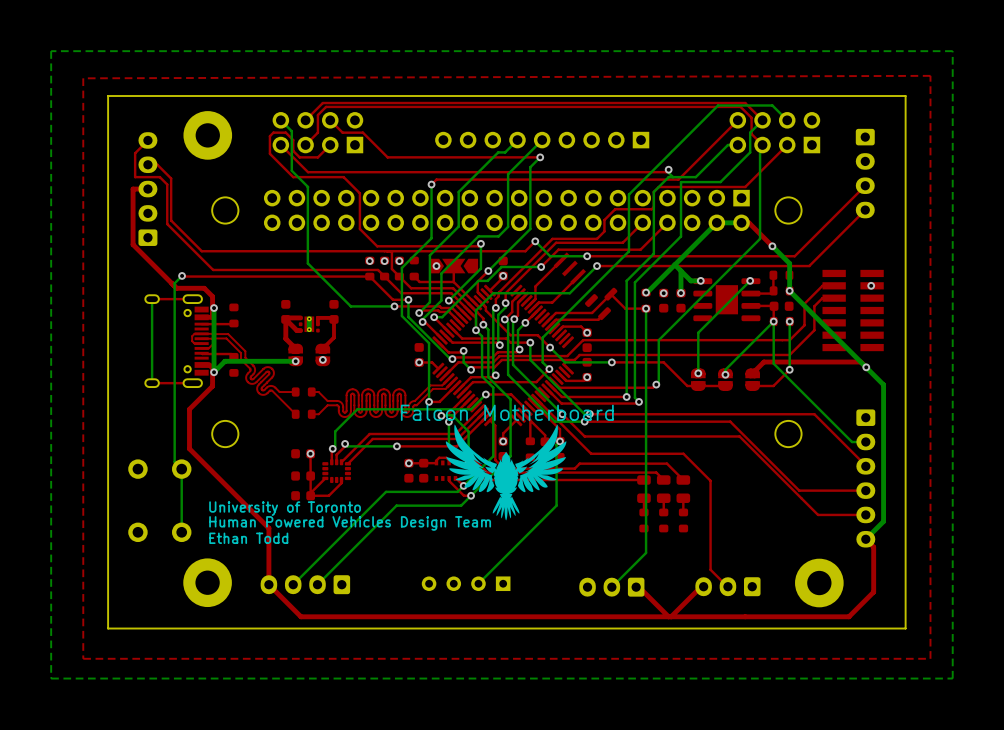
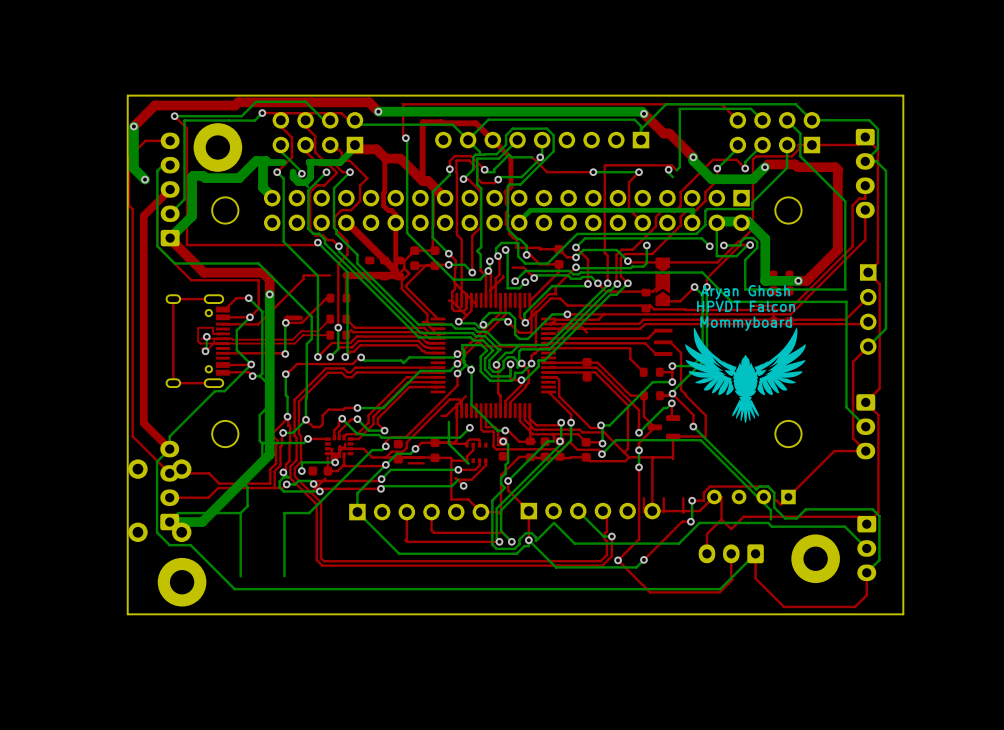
bottom zone outline: (952, 51) (51, 51) (51, 678) (952, 678) (952, 51) -> none
top zone outline: (930, 75) (83, 78) (83, 658) (930, 658) (930, 75) -> none
board edge: (905, 96) (108, 96) (108, 628) (905, 628) (905, 96) -> (903, 95) (903, 614) (127, 614) (127, 95) (903, 95)
top track: none -> (378, 111) (369, 102) (238, 102) (235, 105) (154, 105) (133, 126)
bottom track: none -> (378, 111) (641, 111) (643, 113)
via: none -> (378, 111)
top track: none -> (262, 113) (341, 113) (353, 124)
bottom track: none -> (262, 113) (254, 120) (229, 120)
via: none -> (262, 113)
top track: none -> (643, 113) (663, 133) (669, 133) (693, 157)
via: none -> (643, 113)
top track: none -> (174, 116) (187, 128) (187, 245) (315, 245) (317, 242)
bottom track: none -> (174, 116) (241, 116) (256, 101) (305, 101) (328, 124)
via: none -> (174, 116)
bottom track: none -> (184, 120) (184, 199) (170, 213)
bottom track: none -> (229, 120) (184, 120)
bottom track: (280, 120) (291, 131) (291, 170) -> none
top track: (330, 120) (342, 132) (362, 132) (387, 157) (540, 157) -> none
top track: (737, 120) (678, 179) (436, 179) (431, 184) -> (737, 120) (721, 104) (403, 104) (403, 135) (405, 138)
top track: (762, 120) (745, 103) (322, 103) (305, 120) -> none
bottom track: (762, 120) (750, 132) (750, 152) (720, 182) (681, 182) (681, 236) (634, 282) (634, 397) (639, 401) -> (762, 120) (750, 108) (679, 108) (679, 167) (676, 170)
bottom track: (787, 120) (772, 105) (718, 105) (628, 194) (628, 251) (542, 337) (542, 362) (549, 369) -> (787, 120) (800, 133) (800, 156) (845, 201) (845, 289) (745, 289) (745, 259) (757, 247) (757, 242) (753, 238) (744, 238) (740, 242) (740, 245) (723, 245)
top track: none -> (279, 124) (291, 137) (291, 157) (277, 172)
bottom track: none -> (353, 124) (452, 124) (479, 151) (479, 154)
bottom track: none -> (133, 126) (133, 168) (145, 179)
via: none -> (133, 126)
bottom track: none -> (641, 129) (666, 104) (795, 104) (811, 120) (869, 120) (877, 128) (877, 148) (865, 161) (876, 161) (886, 170) (886, 328) (868, 346)
part position: (207, 135) -> (217, 147)
bottom track: none -> (405, 138) (407, 233) (453, 279) (480, 279) (489, 269) (489, 261)
via: none -> (405, 138)
top track: (147, 140) (135, 153) (135, 177) (159, 177) (167, 184) (167, 224) (213, 269) (378, 269) (401, 293) (451, 293) (476, 317) (476, 330) -> none
top track: none -> (170, 140) (145, 140) (128, 157) (128, 205) (132, 209) (132, 436) (169, 473) (209, 473) (219, 483) (270, 483) (270, 469) (276, 463) (277, 443) (271, 434) (287, 416) (288, 425) (290, 425) (289, 461) (283, 472)
bottom track: (542, 140) (508, 174) (508, 226) (498, 236) (478, 236) (441, 273) (441, 300) (422, 319) (422, 322) -> (542, 140) (542, 156) (521, 177) (500, 177) (498, 179)
bottom track: none -> (641, 140) (641, 126) (634, 119) (488, 119) (468, 140)
bottom track: none -> (787, 144) (787, 167) (752, 202) (752, 209) (707, 209) (705, 210) (705, 225) (696, 233) (577, 233) (547, 263) (525, 263) (518, 256) (518, 242) (501, 242) (496, 248) (498, 256)
top track: (280, 145) (308, 172) (342, 172) -> (303, 124) (315, 136) (315, 152) (323, 160) (331, 160) (342, 172)
top track: (330, 145) (317, 157) (299, 157) (293, 150) (293, 140) (285, 132) (273, 132) (269, 136) (269, 153) (293, 177) (343, 177) (359, 193) (359, 229) (377, 246) (478, 246) (480, 243) -> none
bottom track: (737, 145) (727, 145) (695, 177) (668, 177) (653, 191) (653, 253) (626, 280) (626, 396) -> (737, 144) (737, 148) (717, 168)
top track: (762, 145) (751, 134) (751, 117) (740, 106) (326, 106) (317, 115) (317, 132) (305, 145) -> none
bottom track: (762, 145) (760, 147) (760, 238) (658, 340) (658, 382) (656, 384) -> (762, 144) (745, 162) (745, 168)
top track: (787, 145) (767, 164) -> (798, 280) (806, 280) (837, 249) (837, 169) (835, 167) (797, 167) (795, 164) (767, 164)
bottom track: none -> (279, 149) (301, 173)
top track: none -> (303, 149) (319, 165) (329, 165) (337, 172) (324, 185) (316, 185) (310, 192) (310, 230) (315, 235) (323, 235) (327, 240) (332, 240) (338, 246)
top track: none -> (328, 149) (338, 149) (341, 152) (341, 160) (349, 160) (367, 178) (360, 185) (360, 201) (351, 210) (341, 210) (334, 216) (334, 228) (347, 241) (347, 254) (338, 263) (338, 327)
top track: none -> (353, 149) (376, 149) (385, 158) (400, 158) (422, 180)
bottom track: none -> (353, 149) (340, 162) (309, 162) (310, 177) (305, 182) (298, 182) (293, 177) (293, 172)
bottom track: (505, 152) (498, 152) (458, 191) (458, 226) (429, 255) (429, 302) (419, 312) -> (505, 152) (498, 158) (477, 158) (477, 184) (481, 188) (481, 247) (477, 251) (480, 254) (480, 267)
bottom track: none -> (532, 157) (511, 157) (509, 154) (494, 169) (494, 172) (487, 172) (484, 169)
bottom track: (540, 157) (530, 167) (530, 229) (488, 270) -> none
bottom track: none -> (693, 157) (693, 160) (711, 179) (753, 179) (765, 167)
via: none -> (693, 157)
top track: none -> (385, 159) (383, 205) (395, 214) (395, 273) (395, 270) (346, 221)
bottom track: none -> (256, 161) (266, 161) (262, 164) (262, 187) (272, 196)
bottom track: none -> (256, 161) (239, 178) (205, 178) (202, 175) (193, 175) (192, 216) (170, 238)
bottom track: none -> (256, 161) (283, 162)
top track: (147, 164) (157, 164) (171, 178) (171, 220) (201, 251) (525, 251) (535, 241) -> none
bottom track: none -> (170, 165) (163, 165) (157, 170) (157, 246) (174, 263) (258, 263) (311, 316) (311, 339) (306, 343) (306, 419) (292, 432) (283, 432)
top track: (765, 167) (745, 187) (658, 187) (653, 191) (653, 207) (651, 209) (615, 209) (604, 220) (604, 231) (597, 238) (552, 238) (498, 292) (495, 299) (495, 307) -> none
via: none -> (765, 167)
top track: none -> (717, 168) (717, 180) (705, 192) (705, 200) (696, 210) (687, 210) (680, 216) (680, 225) (652, 254) (624, 254) (620, 258) (620, 276) (627, 283)
via: none -> (717, 168)
via: none -> (745, 168)
top track: none -> (449, 169) (449, 161) (454, 156) (471, 156) (484, 169)
bottom track: none -> (449, 169) (449, 174) (432, 191) (432, 237) (448, 253)
via: none -> (449, 169)
via: none -> (484, 169)
top track: (668, 169) (666, 172) (593, 172) -> none
top track: none -> (676, 170) (671, 165) (604, 166) (604, 252) (607, 255) (607, 283)
bottom track: none -> (277, 172) (283, 178) (283, 241) (317, 275) (317, 356)
via: none -> (277, 172)
bottom track: none -> (326, 172) (308, 190) (308, 228) (313, 233) (319, 233) (324, 239) (324, 243) (418, 337) (470, 337) (473, 340) (483, 340) (493, 350) (485, 358) (485, 369) (491, 376) (509, 376) (510, 364)
via: none -> (326, 172)
via: none -> (350, 172)
top track: (547, 172) (350, 172) -> (547, 172) (532, 157)
via: none -> (593, 172)
bottom track: none -> (639, 172) (593, 172)
via: none -> (639, 172)
via: none -> (301, 173)
via: none -> (145, 179)
top track: none -> (463, 179) (468, 179) (480, 191) (480, 227) (472, 235) (472, 272)
bottom track: none -> (463, 179) (473, 169) (473, 156) (475, 154) (496, 154) (506, 144) (506, 135) (512, 128) (546, 128) (553, 135) (553, 151) (520, 184) (507, 186) (507, 229) (526, 245) (526, 254)
via: none -> (463, 179)
top track: none -> (498, 179) (494, 183) (481, 183) (477, 178) (477, 168) (469, 160) (456, 160) (456, 234) (461, 239) (461, 300)
via: none -> (498, 179)
top track: none -> (422, 180) (422, 122) (476, 123) (510, 158) (510, 187) (505, 192) (507, 203)
top track: none -> (422, 180) (427, 180) (445, 198)
bottom track: (431, 184) (431, 238) (401, 267) (401, 316) (429, 343) (429, 401) -> none
via: (431, 184) -> none
top track: (865, 185) (794, 256) (587, 256) -> (865, 185) (865, 198) (859, 198) (852, 205) (852, 246) (788, 310) (685, 310) (654, 309) (650, 305) (567, 305) (560, 298) (550, 298) (535, 313) (535, 346) (483, 346) (478, 341)
bottom track: (308, 187) (307, 263) (350, 306) (394, 306) -> none
top track: (147, 189) (133, 189) (133, 244) (176, 288) (204, 288) (212, 296) (212, 317) (201, 317) -> none
part position: (147, 189) -> (170, 189)
top track: none -> (433, 189) (432, 248) (435, 250) (414, 250) (404, 260) (404, 268)
top track: none -> (507, 210) (505, 212) (505, 224) (509, 228) (509, 234) (516, 238) (516, 247) (559, 249) (567, 257) (576, 257)
top track: (865, 210) (809, 266) (597, 266) -> (865, 210) (865, 239) (790, 314) (567, 314)
bottom track: none -> (692, 221) (692, 210) (530, 210) (519, 221)
top track: (642, 222) (622, 242) (556, 242) (505, 293) (505, 303) -> (642, 222) (628, 209) (628, 182) (639, 172)
top track: (667, 222) (640, 249) (632, 249) -> (745, 168) (736, 159) (713, 159) (680, 192) (680, 205) (674, 212) (672, 210) (662, 210) (656, 216) (656, 226) (632, 249)
top track: (741, 222) (748, 222) (772, 246) -> none
bottom track: (741, 222) (716, 222) (646, 292) -> none
top track: none -> (170, 238) (204, 272) (262, 272) (269, 279) (269, 294)
bottom track: (535, 241) (550, 256) (587, 256) -> none
via: (535, 241) -> none
bottom track: none -> (317, 242) (347, 272) (347, 354) (345, 356)
via: none -> (317, 242)
bottom track: (480, 243) (480, 268) (448, 300) -> none
via: (480, 243) -> none
bottom track: none -> (646, 245) (646, 263) (643, 266) (576, 267)
via: none -> (646, 245)
via: none -> (723, 245)
top track: none -> (750, 245) (740, 245) (706, 278) (706, 287)
bottom track: none -> (750, 245) (747, 245) (736, 256) (716, 256) (716, 221) (748, 221) (765, 238) (765, 280) (798, 280)
via: none -> (750, 245)
bottom track: none -> (338, 246) (338, 251) (420, 333) (472, 333) (475, 336) (485, 336) (500, 349) (489, 360) (489, 367) (493, 371) (499, 371) (503, 367) (503, 361) (507, 357) (513, 357) (517, 361) (517, 367) (521, 363) (519, 360) (519, 351) (521, 349) (549, 349) (617, 283)
via: none -> (338, 246)
bottom track: none -> (709, 246) (701, 238) (585, 238) (576, 247)
via: none -> (709, 246)
bottom track: (772, 246) (789, 263) (789, 290) (866, 367) -> none
via: (772, 246) -> none
via: none -> (576, 247)
bottom track: none -> (505, 249) (507, 251) (507, 288) (519, 288) (525, 282)
via: none -> (505, 249)
top track: (621, 249) (558, 249) (541, 266) -> (621, 249) (616, 255) (617, 283)
top track: none -> (578, 250) (587, 259) (587, 283)
top track: (391, 251) (391, 269) (411, 288) (453, 288) (483, 318) (483, 324) -> none
top track: none -> (448, 253) (455, 260) (452, 308) (454, 310) (464, 310) (466, 308) (466, 300)
via: none -> (448, 253)
top track: none -> (526, 254) (530, 254) (539, 264) (559, 264) (559, 271) (529, 300)
via: none -> (526, 254)
top track: none -> (498, 256) (499, 274) (495, 278) (495, 300)
via: none -> (498, 256)
part: none -> (559, 256)
via: (587, 256) -> none
bottom track: none -> (576, 257) (583, 249) (616, 249) (627, 261)
via: none -> (576, 257)
part: none -> (414, 258)
part: none -> (435, 258)
top track: (561, 260) (535, 286) (535, 299) (530, 304) -> none
via: (369, 261) -> none
via: (384, 261) -> none
via: (399, 261) -> none
top track: none -> (489, 261) (490, 300)
via: none -> (489, 261)
top track: none -> (627, 261) (717, 262) (752, 228) (752, 159) (756, 156) (791, 156) (798, 149) (798, 144) (857, 144) (865, 137) (877, 149) (877, 262) (868, 272) (879, 283) (879, 388) (865, 402) (878, 415) (878, 512) (866, 524) (859, 516) (743, 516) (731, 529) (721, 519)
via: none -> (627, 261)
top track: none -> (448, 264) (414, 265)
bottom track: none -> (448, 264) (464, 264) (472, 272)
via: none -> (448, 264)
bottom track: (674, 264) (690, 280) (700, 280) -> none
top track: none -> (425, 265) (406, 287) (438, 319)
via: (436, 266) -> none
top track: (453, 266) (453, 282) (419, 282) (414, 276) -> none
part rotation: 0° (453, 266) -> 90° clockwise (662, 281)
part position: (453, 266) -> (662, 281)
bottom track: (541, 266) (501, 266) (487, 280) (478, 280) (442, 317) (434, 317) -> none
via: (541, 266) -> none
bottom track: (597, 266) (569, 293) (493, 293) (476, 310) (476, 330) -> (350, 172) (333, 188) (333, 227) (336, 233) (357, 254) (357, 263) (418, 324) (451, 324) (455, 328) (476, 330)
via: (597, 266) -> none
top track: none -> (480, 267) (480, 270) (486, 276) (486, 300)
top track: none -> (512, 267) (523, 267) (534, 278)
top track: none -> (575, 267) (555, 287) (556, 294) (549, 294) (531, 311) (531, 332) (519, 332) (508, 321)
via: none -> (576, 267)
top track: none -> (404, 268) (409, 273) (401, 280) (401, 288) (427, 314) (427, 321) (429, 323) (438, 323)
top track: none -> (404, 268) (397, 275) (346, 275) (346, 298)
part: (414, 268) -> none
part: (503, 268) -> none
part: (569, 268) -> none
top track: (488, 270) (477, 281) (477, 292) (483, 297) -> none
bottom track: (680, 270) (680, 293) -> none
via: none -> (472, 272)
top track: (182, 275) (369, 276) (393, 299) (408, 299) -> none
bottom track: (182, 275) (174, 283) (174, 462) (181, 469) (181, 532) -> none
via: (182, 275) -> none
top track: none -> (330, 275) (303, 275) (303, 278) (258, 324) (222, 324)
via: (503, 275) -> none
top track: (773, 275) (773, 290) (770, 293) (750, 293) -> none
top track: (578, 276) (552, 302) (538, 302) (533, 307) -> none
bottom track: none -> (534, 278) (536, 275) (567, 275) (571, 278) (591, 276) (597, 283)
via: none -> (534, 278)
via: (700, 280) -> none
bottom track: (750, 280) (698, 332) (698, 373) -> none
via: (750, 280) -> none
bottom track: none -> (515, 281) (525, 270) (569, 270) (573, 274) (580, 272) (702, 272) (731, 301) (846, 301) (846, 407) (865, 426)
via: none -> (515, 281)
top track: none -> (662, 281) (652, 291) (606, 291) (597, 283)
via: none -> (525, 282)
bottom track: none -> (587, 283) (585, 286) (552, 286) (524, 313) (524, 321)
via: none -> (587, 283)
via: none -> (597, 283)
via: none -> (607, 283)
via: none -> (617, 283)
bottom track: none -> (627, 283) (616, 294) (610, 294) (544, 360) (538, 360)
via: none -> (627, 283)
top track: (834, 285) (822, 285) (804, 303) (804, 325) (789, 340) (583, 340) (567, 356) (499, 356) (493, 362) (458, 362) (445, 375) -> none
via: (871, 285) -> none
top track: none -> (694, 287) (680, 301) (662, 301)
bottom track: none -> (694, 287) (702, 295) (702, 355) (692, 366) (672, 366)
via: none -> (694, 287)
bottom track: none -> (706, 287) (706, 357) (672, 393)
via: none -> (706, 287)
via position: (789, 290) -> (798, 280)
via: (646, 292) -> none
text: none -> Aryan Ghosh (745, 292)
via: (663, 293) -> none
via: (680, 293) -> none
bottom track: none -> (269, 294) (269, 454) (202, 522) (169, 522) (178, 513) (240, 513)
via: none -> (269, 294)
top track: (519, 294) (512, 301) (512, 312) (504, 319) -> none
top track: (523, 297) (517, 302) (517, 315) (514, 319) -> none
top track: none -> (868, 297) (845, 319) (643, 319) (639, 323) (548, 323)
top track: none -> (248, 298) (236, 298) (222, 309)
bottom track: none -> (248, 298) (262, 311) (262, 373) (259, 376) (252, 376)
via: none -> (248, 298)
top track: none -> (330, 298) (326, 298) (301, 322) (285, 322)
part: none -> (338, 298)
top track: (834, 298) (822, 298) (814, 306) (814, 330) (789, 354) (579, 354) (574, 359) (501, 359) (494, 367) (473, 367) (471, 369) -> none
bottom track: (152, 299) (152, 383) -> none
top track: (173, 299) (152, 299) -> (173, 299) (173, 383)
top track: none -> (213, 299) (192, 299)
bottom track: (408, 299) (408, 317) (452, 359) -> none
via: (408, 299) -> none
part: (726, 299) -> none
via: (448, 300) -> none
top track: (479, 300) (485, 307) (485, 310) (510, 335) (537, 335) (550, 347) -> none
top track: none -> (500, 300) (500, 313) (457, 354)
top track: none -> (505, 300) (505, 314) (457, 363)
top track: none -> (520, 300) (520, 317) (524, 321)
part: (663, 300) -> none
part: (680, 300) -> none
bottom track: (505, 303) (505, 307) (498, 314) (498, 343) (499, 345) -> none
via: (505, 303) -> none
part: (601, 303) -> none
top track: (394, 306) (452, 308) (462, 318) -> none
via: (394, 306) -> none
text: none -> HPVDT Falcon (746, 306)
part: (781, 306) -> none
bottom track: (495, 307) (493, 310) (493, 372) (495, 375) -> none
via: (495, 307) -> none
bottom track: (214, 308) (214, 372) (225, 361) (295, 361) -> none
via: (214, 308) -> none
top track: (646, 308) (625, 308) (610, 294) (592, 312) (555, 312) (547, 321) -> none
bottom track: (646, 308) (646, 552) (611, 587) -> none
via: (646, 308) -> none
part: none -> (868, 309)
part: (853, 310) -> none
part: (285, 311) -> none
part: (333, 311) -> none
top track: (419, 312) (421, 310) (449, 311) (458, 321) -> (471, 300) (471, 310) (458, 321)
via: (419, 312) -> none
bottom track: none -> (567, 314) (552, 314) (527, 338) (519, 338) (515, 334) (515, 318) (509, 312) (489, 312) (482, 320)
via: none -> (567, 314)
part: (233, 315) -> none
top track: none -> (222, 317) (249, 317) (258, 308) (258, 280) (191, 280) (157, 246) (157, 202) (170, 189) (143, 215) (143, 423) (169, 449)
bottom track: none -> (249, 317) (236, 330) (236, 350) (251, 364) (224, 391) (215, 391) (169, 436) (169, 449) (157, 461) (157, 532) (169, 545) (190, 545) (234, 589) (720, 589) (755, 553)
via: none -> (249, 317)
top track: (434, 317) (448, 331) -> none
via: (434, 317) -> none
part: none -> (338, 319)
top track: none -> (346, 319) (354, 327) (424, 327) (429, 333) (438, 333)
bottom track: (504, 319) (508, 322) (508, 374) (555, 421) (584, 421) -> none
via: (504, 319) -> none
bottom track: (514, 319) (513, 364) (562, 414) -> none
via: (514, 319) -> none
bottom track: none -> (458, 321) (460, 323) (475, 323) (479, 327) (485, 327) (493, 319) (505, 319) (508, 321)
via: none -> (458, 321)
via: none -> (508, 321)
via: (773, 321) -> none
bottom track: (789, 321) (789, 369) -> none
via: (789, 321) -> none
top track: none -> (868, 321) (866, 324) (645, 324) (640, 328) (548, 328)
bottom track: none -> (285, 322) (285, 353)
via: none -> (285, 322)
via: (422, 322) -> none
bottom track: (525, 322) (517, 330) (519, 349) -> none
top track: (233, 323) (201, 324) -> none
text: none -> Mommyboard (746, 323)
part: (309, 324) -> none
top track: (317, 324) (317, 317) (333, 319) (333, 337) (322, 348) -> none
bottom track: (483, 324) (488, 329) (488, 377) (510, 399) (510, 456) (461, 505) (396, 505) (317, 584) -> none
bottom track: none -> (338, 327) (338, 348) (330, 356)
via: none -> (338, 327)
drawing: none -> [685, 327, 806, 424]
top track: (452, 328) (462, 338) (506, 338) (510, 342) (530, 342) -> none
top track: (300, 330) (296, 330) (285, 319) (285, 338) (295, 348) -> none
via: (476, 330) -> none
top track: none -> (663, 330) (655, 330) (648, 338) (548, 338)
bottom track: (477, 331) (482, 336) (482, 376) (493, 387) (493, 456) (457, 491) (386, 491) (293, 584) -> (477, 331) (486, 331) (500, 344) (547, 344) (607, 283)
via: (587, 332) -> none
top track: none -> (330, 335) (303, 335) (294, 343) (201, 343)
part: none -> (338, 335)
top track: none -> (346, 335) (351, 330) (353, 332) (422, 332) (428, 337) (438, 338)
top track: (445, 335) (452, 342) (497, 342) (499, 345) -> none
bottom track: none -> (206, 336) (205, 351)
via: none -> (206, 336)
top track: (212, 338) (226, 338) (240, 353) (240, 359) (250, 369) (246, 377) (248, 382) (254, 383) (266, 371) (269, 371) (269, 374) (257, 385) (257, 391) (263, 394) (271, 390) (295, 414) -> (212, 338) (292, 339) (301, 331) (318, 331) (330, 319)
part: (587, 340) -> none
part position: (176, 341) -> (197, 341)
top track: (438, 342) (448, 352) (463, 350) -> none
bottom track: (530, 342) (530, 359) (584, 413) (589, 413) -> none
via: (530, 342) -> none
part: none -> (663, 342)
top track: (200, 343) (194, 343) (192, 341) (192, 336) (194, 333) (228, 334) (245, 351) (245, 357) (254, 366) (254, 371) (251, 379) (265, 367) (273, 369) (273, 375) (261, 387) (262, 390) (271, 385) (279, 392) (295, 392) -> (200, 343) (198, 341) (198, 327) (212, 327) (213, 333) (222, 333)
top track: none -> (438, 343) (428, 343) (420, 336) (356, 336) (350, 342) (331, 342) (317, 356)
top track: none -> (548, 343) (645, 343) (655, 353) (663, 353)
bottom track: none -> (519, 344) (511, 352) (505, 352) (496, 362) (496, 364)
via: (499, 345) -> none
top track: none -> (868, 346) (853, 361) (853, 438) (865, 451) (834, 451) (780, 504) (774, 500) (774, 492) (768, 486) (710, 486) (703, 492) (703, 500) (692, 500)
bottom track: (550, 347) (564, 362) (611, 362) -> none
via: (550, 347) -> none
top track: none -> (438, 348) (426, 347) (418, 340) (358, 340) (352, 347) (339, 347) (330, 356)
top track: (519, 349) (516, 352) (497, 352) (492, 357) (454, 357) (452, 359) -> none
via: (519, 349) -> none
via: (463, 350) -> none
via: none -> (205, 351)
top track: (201, 353) (231, 354) (233, 356) -> none
top track: none -> (222, 353) (285, 353)
via: none -> (285, 353)
top track: none -> (438, 353) (425, 353) (416, 345) (360, 345) (345, 356)
part: (295, 354) -> none
part: (322, 354) -> none
part: (419, 354) -> none
bottom track: none -> (457, 354) (454, 357) (409, 357) (403, 363) (401, 360) (364, 360) (361, 357)
via: none -> (457, 354)
part: none -> (493, 355)
part: (503, 355) -> none
via: none -> (317, 356)
via: none -> (330, 356)
via: none -> (345, 356)
top track: none -> (361, 357) (352, 364) (297, 364) (285, 374)
via: none -> (361, 357)
via: (322, 359) -> none
via: (452, 359) -> none
bottom track: none -> (538, 360) (538, 366) (525, 380) (521, 380)
via: (295, 361) -> none
top track: (419, 362) (432, 362) (438, 368) -> none
via: (419, 362) -> none
top track: none -> (548, 362) (597, 362) (630, 395) (643, 395) (643, 416) (654, 427) (639, 443) (639, 450)
top track: (611, 362) (663, 362) (687, 385) (725, 385) -> none
via: (611, 362) -> none
bottom track: none -> (457, 363) (450, 370) (420, 370) (383, 408) (357, 408)
via: none -> (457, 363)
top track: none -> (521, 363) (528, 370) (528, 382) (510, 402) (510, 410)
via: none -> (521, 363)
top track: none -> (531, 363) (531, 355) (540, 348) (629, 348) (630, 358) (643, 372)
bottom track: none -> (531, 363) (522, 372) (514, 372) (514, 377) (511, 380) (490, 380) (480, 371) (480, 356) (486, 350) (481, 345) (462, 345) (464, 351) (462, 358) (464, 366) (457, 373)
via: none -> (531, 363)
top track: (201, 364) (209, 364) (212, 368) (212, 386) (189, 409) (189, 448) (268, 528) (268, 584) (301, 616) (848, 616) (873, 592) (873, 547) (865, 539) -> none
part: (233, 364) -> none
top track: none -> (251, 364) (222, 364)
via: none -> (251, 364)
top track: none -> (496, 364) (498, 366) (500, 410)
via: none -> (496, 364)
top track: none -> (510, 364) (510, 379) (521, 380) (521, 385) (505, 401) (505, 410)
via: none -> (510, 364)
bottom track: none -> (472, 366) (471, 404) (497, 430) (505, 430)
via: none -> (672, 366)
top track: none -> (438, 367) (355, 367) (350, 372) (347, 372) (343, 368) (326, 368) (294, 399) (296, 460) (290, 466) (290, 478) (316, 504) (316, 560) (322, 565) (602, 565) (611, 556) (611, 536)
top track: none -> (548, 367) (596, 367) (639, 410) (639, 432)
top track: (866, 367) (860, 362) (763, 362) (752, 373) -> none
bottom track: (866, 367) (883, 384) (883, 521) (865, 539) -> none
via: (866, 367) -> none
top track: (549, 369) (536, 382) (473, 382) (462, 392) -> none
via: (549, 369) -> none
top track: (789, 369) (773, 385) (752, 385) -> none
via: (789, 369) -> none
via: (214, 372) -> none
top track: none -> (222, 372) (248, 372) (252, 376)
top track: none -> (438, 372) (356, 372) (352, 377) (346, 377) (341, 372) (327, 372) (298, 401) (300, 461) (294, 468) (294, 476) (321, 502) (321, 558) (324, 561) (600, 561) (606, 555) (606, 541) (604, 539) (606, 515) (602, 511)
top track: none -> (548, 372) (595, 372) (627, 405) (627, 448) (624, 452)
part: none -> (651, 372)
top track: none -> (672, 372) (659, 372)
top track: none -> (457, 373) (457, 385) (405, 437) (390, 437) (385, 442) (385, 446)
via: none -> (457, 373)
via: (698, 373) -> none
bottom track: none -> (285, 374) (287, 416)
via: none -> (285, 374)
bottom track: (725, 374) (725, 369) (773, 321) (773, 363) (852, 442) (865, 442) -> none
via: (725, 374) -> none
bottom track: none -> (259, 375) (269, 385) (269, 405) (259, 415) (259, 440) (262, 443) (262, 459) (244, 478) (244, 483) (247, 487) (247, 506) (240, 513)
top track: (495, 375) (493, 377) (471, 377) (458, 389) -> none
via: (495, 375) -> none
top track: (561, 375) (566, 380) (583, 380) (587, 377) -> none
via: none -> (252, 376)
top track: none -> (438, 377) (406, 377) (368, 415) (368, 422) (357, 434) (346, 434) (344, 437)
top track: none -> (548, 377) (556, 377) (559, 379) (559, 396) (590, 428) (598, 428) (601, 425)
via: (587, 377) -> none
top track: (448, 379) (442, 385) (430, 385) (410, 403) (407, 412) (405, 411) (405, 393) (400, 389) (396, 390) (393, 393) (393, 411) (391, 412) (389, 411) (389, 393) (385, 389) (380, 390) (378, 393) (377, 411) (376, 412) (374, 411) (374, 393) (370, 389) (365, 389) (362, 392) (362, 411) (360, 412) (358, 411) (358, 393) (355, 389) (350, 389) (347, 392) (346, 411) (344, 412) (340, 401) (327, 400) (318, 392) (311, 392) -> none
part: (698, 379) -> none
part: (725, 379) -> none
part: (752, 379) -> none
via: none -> (521, 380)
top track: none -> (438, 382) (408, 382) (373, 416) (373, 424) (358, 439) (350, 439)
top track: (452, 382) (445, 388) (433, 388) (416, 405) (413, 405) (412, 413) (408, 416) (403, 416) (401, 412) (401, 395) (399, 393) (397, 395) (397, 412) (392, 416) (388, 416) (385, 412) (385, 395) (383, 393) (382, 395) (381, 412) (377, 416) (372, 416) (370, 412) (369, 395) (368, 393) (366, 395) (366, 412) (362, 416) (357, 416) (354, 413) (354, 395) (352, 393) (350, 395) (350, 412) (347, 416) (340, 415) (337, 405) (327, 405) (318, 414) (311, 414) -> none
top track: (554, 382) (559, 387) (653, 387) (656, 384) -> none
bottom track: none -> (672, 382) (652, 382) (609, 425) (601, 425) (602, 443)
via: none -> (672, 382)
top track: (173, 383) (152, 383) -> (213, 383) (192, 383)
via: (656, 384) -> none
top track: (455, 385) (439, 401) (429, 401) -> none
top track: (550, 385) (561, 396) (626, 396) -> none
top track: none -> (438, 387) (409, 387) (377, 418) (377, 423) (384, 430)
top track: (547, 389) (561, 403) (637, 403) (639, 401) -> none
top track: none -> (548, 391) (571, 414) (571, 422)
part: (303, 392) -> none
via: none -> (672, 393)
top track: (485, 394) (511, 394) (526, 409) -> none
bottom track: (485, 394) (471, 409) (357, 409) (335, 431) (335, 446) (332, 448) -> none
via: (485, 394) -> none
part: none -> (651, 395)
top track: none -> (660, 395) (674, 395) (693, 414) (693, 426)
via: (626, 396) -> none
top track: (469, 399) (448, 421) -> none
top track: (537, 399) (591, 453) (683, 453) (710, 480) (710, 569) (727, 586) -> none
via: (429, 401) -> none
via: (639, 401) -> none
top track: (533, 403) (559, 429) (559, 441) -> none
top track: none -> (671, 403) (673, 418)
bottom track: none -> (671, 403) (667, 408) (663, 408) (639, 432)
via: none -> (671, 403)
top track: none -> (357, 407) (328, 409) (322, 415) (322, 424) (320, 427) (313, 427) (306, 419)
via: none -> (357, 407)
top track: (479, 409) (455, 434) (369, 434) (341, 462) -> none
top track: none -> (456, 410) (456, 440) (454, 442) (421, 442) (415, 448)
top track: none -> (461, 410) (461, 402) (458, 399) (449, 399) (406, 442) (406, 447) (402, 451) (391, 451) (385, 457)
top track: none -> (481, 410) (481, 429) (483, 431) (493, 431) (493, 446) (496, 449) (555, 449) (560, 451) (569, 442) (577, 449) (598, 449) (601, 454)
top track: none -> (520, 410) (520, 421) (533, 434) (578, 434) (586, 442) (602, 443)
top track: none -> (524, 410) (524, 419) (534, 429) (579, 429) (582, 432) (604, 432) (629, 457)
top track: none -> (529, 410) (529, 418) (536, 425) (558, 425) (561, 422)
text: Falcon Motherboard (507, 412) -> none
top track: (483, 413) (457, 438) (372, 438) (347, 463) -> none
top track: (523, 413) (545, 435) (545, 441) -> none
via: (589, 413) -> none
part: (303, 414) -> none
top track: (562, 414) (584, 436) (673, 436) -> (629, 457) (673, 458) (673, 436)
via: (562, 414) -> none
top track: (589, 414) (814, 414) (865, 466) -> none
bottom track: (441, 415) (452, 415) (468, 431) (468, 454) -> none
via: (441, 415) -> none
via: none -> (287, 416)
top track: (486, 416) (456, 446) (396, 446) -> none
top track: none -> (342, 418) (334, 430) (334, 437)
bottom track: none -> (342, 418) (357, 434) (379, 435) (381, 437) (459, 437) (469, 427)
via: none -> (342, 418)
via: none -> (306, 419)
top track: none -> (357, 419) (351, 419) (339, 431) (339, 437)
bottom track: none -> (357, 419) (368, 430) (384, 430)
via: none -> (357, 419)
top track: (489, 420) (495, 425) (495, 459) (503, 468) (574, 468) (579, 463) (666, 463) (683, 480) -> none
top track: (516, 420) (503, 433) (503, 441) -> none
via: (448, 421) -> none
top track: none -> (485, 421) (485, 427) (495, 427) (498, 430) (498, 444) (502, 444) (505, 442)
top track: (584, 421) (730, 421) (799, 490) (865, 490) -> none
via: (584, 421) -> none
bottom track: none -> (561, 422) (561, 443) (496, 508) (496, 539) (499, 541)
via: none -> (561, 422)
bottom track: none -> (571, 422) (571, 440) (501, 510) (501, 531) (511, 541)
via: none -> (571, 422)
drawing: [445, 424, 567, 521] -> none
via: none -> (601, 425)
bottom track: none -> (693, 426) (756, 489) (759, 486) (768, 486) (774, 492) (774, 507) (785, 518) (796, 518) (805, 509) (872, 509) (879, 516) (879, 560) (866, 572)
via: none -> (693, 426)
part: none -> (865, 426)
via: none -> (469, 427)
part: none -> (663, 427)
via: none -> (384, 430)
top track: none -> (505, 430) (508, 430) (519, 441) (535, 441)
via: none -> (505, 430)
top track: none -> (283, 432) (280, 446) (280, 465) (274, 471) (274, 487)
via: none -> (283, 432)
via: none -> (639, 432)
top track: none -> (555, 434) (553, 441)
top track: (705, 436) (739, 436) (818, 514) (865, 514) -> (705, 436) (705, 415) (681, 389) (681, 352) (670, 342) (663, 342)
bottom track: none -> (308, 438) (303, 443) (261, 443)
via: none -> (308, 438)
top track: none -> (327, 438) (308, 438)
bottom track: none -> (553, 441) (547, 441) (508, 480)
bottom track: (559, 441) (556, 444) (556, 505) (478, 583) -> none
bottom track: none -> (505, 442) (508, 444) (508, 462) (505, 464) (505, 473) (501, 478) (501, 483) (504, 487) (492, 500) (492, 544) (496, 548) (514, 548) (525, 533) (531, 533) (535, 537) (535, 541) (554, 522) (574, 543) (679, 543) (699, 522) (768, 522) (771, 526) (844, 526) (866, 548)
bottom track: (345, 443) (347, 446) (396, 446) -> none
via: (345, 443) -> none
top track: none -> (451, 443) (466, 445) (469, 439) (478, 439) (479, 445)
via: none -> (602, 443)
top track: none -> (473, 445) (473, 450) (466, 456) (466, 460) (453, 460) (450, 457) (372, 457) (363, 448) (342, 448) (340, 446) (339, 455) (334, 455)
bottom track: none -> (385, 446) (382, 450) (372, 450) (309, 513) (284, 513) (284, 576)
via: none -> (385, 446)
via: (396, 446) -> none
via: (332, 448) -> none
bottom track: none -> (415, 448) (410, 453) (396, 453) (357, 493) (357, 512) (399, 553) (516, 553) (524, 546) (528, 546) (528, 540) (556, 567) (636, 567) (643, 559)
via: none -> (415, 448)
part: none -> (586, 449)
part: none -> (435, 450)
bottom track: none -> (639, 450) (639, 467)
via: none -> (639, 450)
part: none -> (398, 451)
part: (303, 453) -> none
top track: (310, 453) (310, 495) (328, 495) (341, 483) (341, 479) -> none
via: (310, 453) -> none
top track: (468, 454) (487, 472) (656, 472) (663, 480) -> none
bottom track: none -> (601, 454) (615, 440) (700, 440) (770, 510) (770, 519)
via: none -> (601, 454)
top track: none -> (344, 455) (344, 464) (337, 471) (327, 471) (327, 457)
top track: none -> (629, 457) (625, 461) (589, 461) (586, 457) (519, 456) (501, 475) (501, 514) (498, 512) (480, 512) (468, 499) (451, 499) (451, 458)
top track: none -> (653, 457) (652, 511) (699, 511) (713, 497) (721, 497) (721, 519)
top track: none -> (479, 460) (479, 465) (475, 469) (458, 469)
top track: none -> (485, 460) (485, 465) (471, 479) (458, 479)
bottom track: none -> (335, 462) (301, 462) (301, 471)
via: none -> (335, 462)
top track: (449, 462) (446, 457) (439, 457) (436, 463) (423, 463) -> none
via: (408, 463) -> none
top track: (468, 463) (484, 480) (643, 480) -> none
top track: none -> (385, 464) (343, 464)
via: none -> (385, 464)
top track: none -> (639, 467) (639, 539) (618, 560) (650, 592) (719, 592) (732, 579) (731, 553)
via: none -> (639, 467)
bottom track: none -> (458, 469) (390, 469) (381, 479)
via: none -> (458, 469)
part: (408, 470) -> none
part: (423, 470) -> none
part position: (445, 470) -> (476, 452)
via: none -> (301, 471)
part: none -> (320, 471)
part position: (336, 471) -> (339, 446)
bottom track: none -> (283, 472) (288, 477) (283, 477) (279, 481) (279, 487) (283, 491) (319, 491)
via: none -> (283, 472)
part: (303, 476) -> none
top track: (449, 478) (449, 480) (463, 495) (471, 495) -> none
part: (865, 478) -> none
top track: none -> (381, 479) (379, 480) (316, 480) (313, 484)
via: none -> (381, 479)
bottom track: none -> (458, 479) (451, 486) (383, 486) (380, 488)
top track: none -> (508, 480) (508, 490) (528, 511) (528, 540)
via: none -> (508, 480)
top track: none -> (286, 484) (283, 487) (218, 487) (208, 497) (169, 497)
via: none -> (286, 484)
bottom track: none -> (313, 484) (310, 480) (298, 480) (295, 484) (286, 484)
via: none -> (313, 484)
top track: none -> (380, 488) (318, 488) (316, 490) (319, 491)
via: none -> (380, 488)
part: (643, 489) -> none
part: (663, 489) -> none
part: (683, 489) -> none
via: none -> (319, 491)
part: (303, 495) -> none
via: (471, 495) -> none
part: none -> (751, 497)
bottom track: none -> (692, 500) (690, 521)
via: none -> (692, 500)
text: University of Toronto (285, 508) -> none
bottom track: none -> (578, 511) (603, 536) (611, 536)
part: none -> (590, 511)
top track: none -> (406, 512) (405, 540) (407, 541) (499, 541)
part: none -> (419, 512)
top track: none -> (431, 512) (431, 530) (434, 532) (502, 532) (511, 541)
bottom track: none -> (240, 513) (240, 576)
top track: none -> (721, 519) (706, 534) (706, 553)
part: (643, 520) -> none
part: (663, 520) -> none
part: (683, 520) -> none
top track: none -> (690, 521) (682, 521) (643, 559)
via: none -> (690, 521)
text: Human Powered Vehicles Design Team (350, 523) -> none
via: none -> (611, 536)
text: Ethan Todd (248, 538) -> none
via: none -> (528, 540)
via: none -> (499, 541)
via: none -> (511, 541)
part: none -> (866, 548)
top track: none -> (755, 553) (755, 578) (783, 606) (855, 606) (866, 595) (866, 572)
via: none -> (643, 559)
via: none -> (618, 560)
part position: (207, 582) -> (182, 582)
part: (466, 583) -> none
part position: (819, 583) -> (815, 558)
part rotation: 0° (305, 584) -> 90° clockwise (169, 485)
part position: (305, 584) -> (169, 485)
top track: (703, 586) (701, 586) (671, 616) -> none
part position: (727, 586) -> (731, 553)
part: (611, 587) -> none
top track: (636, 587) (639, 587) (668, 616) -> none

